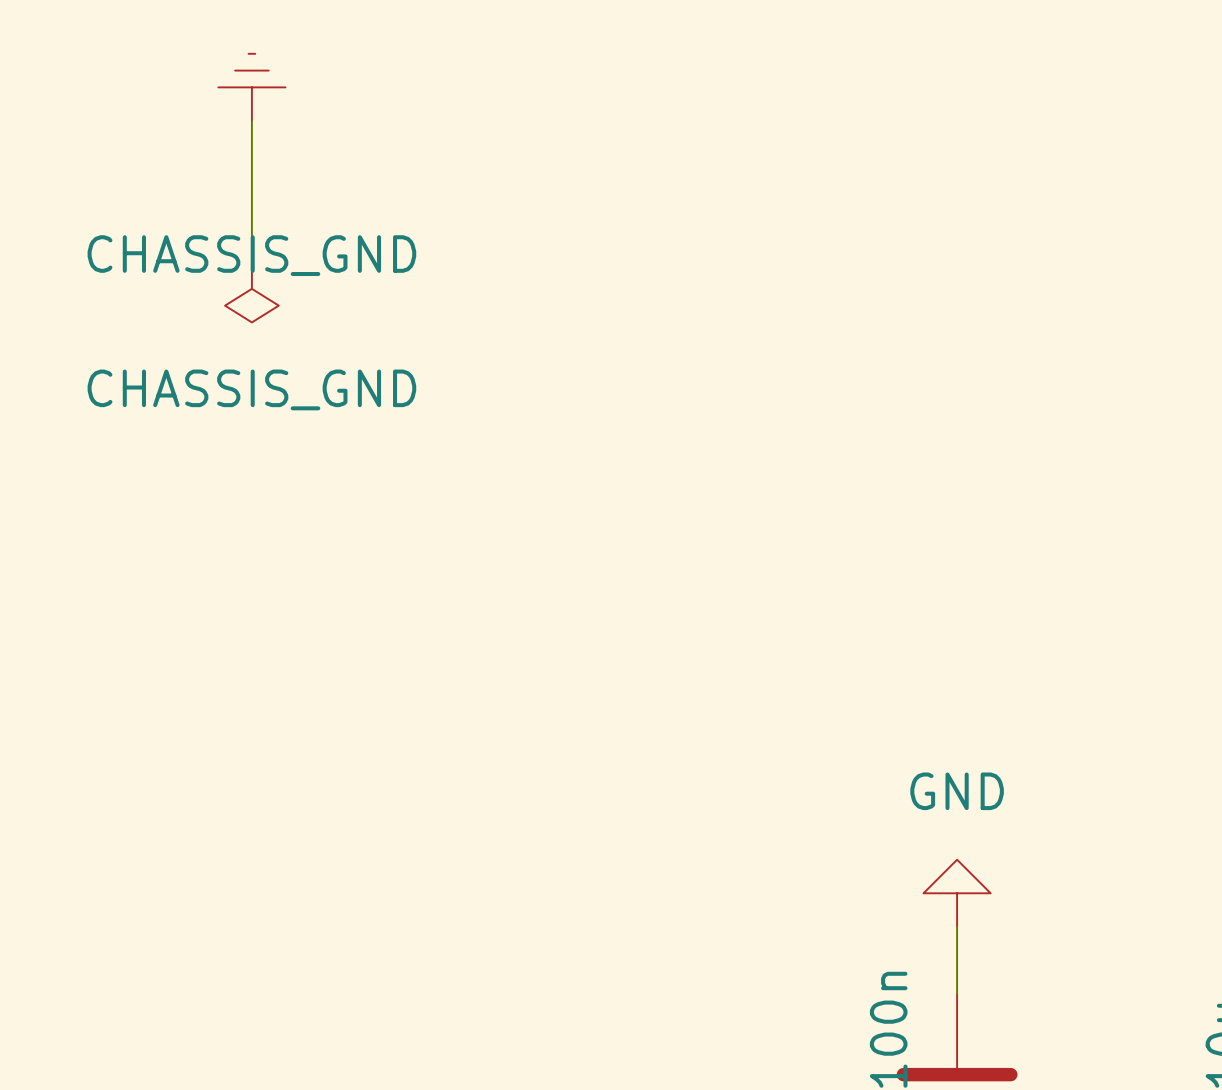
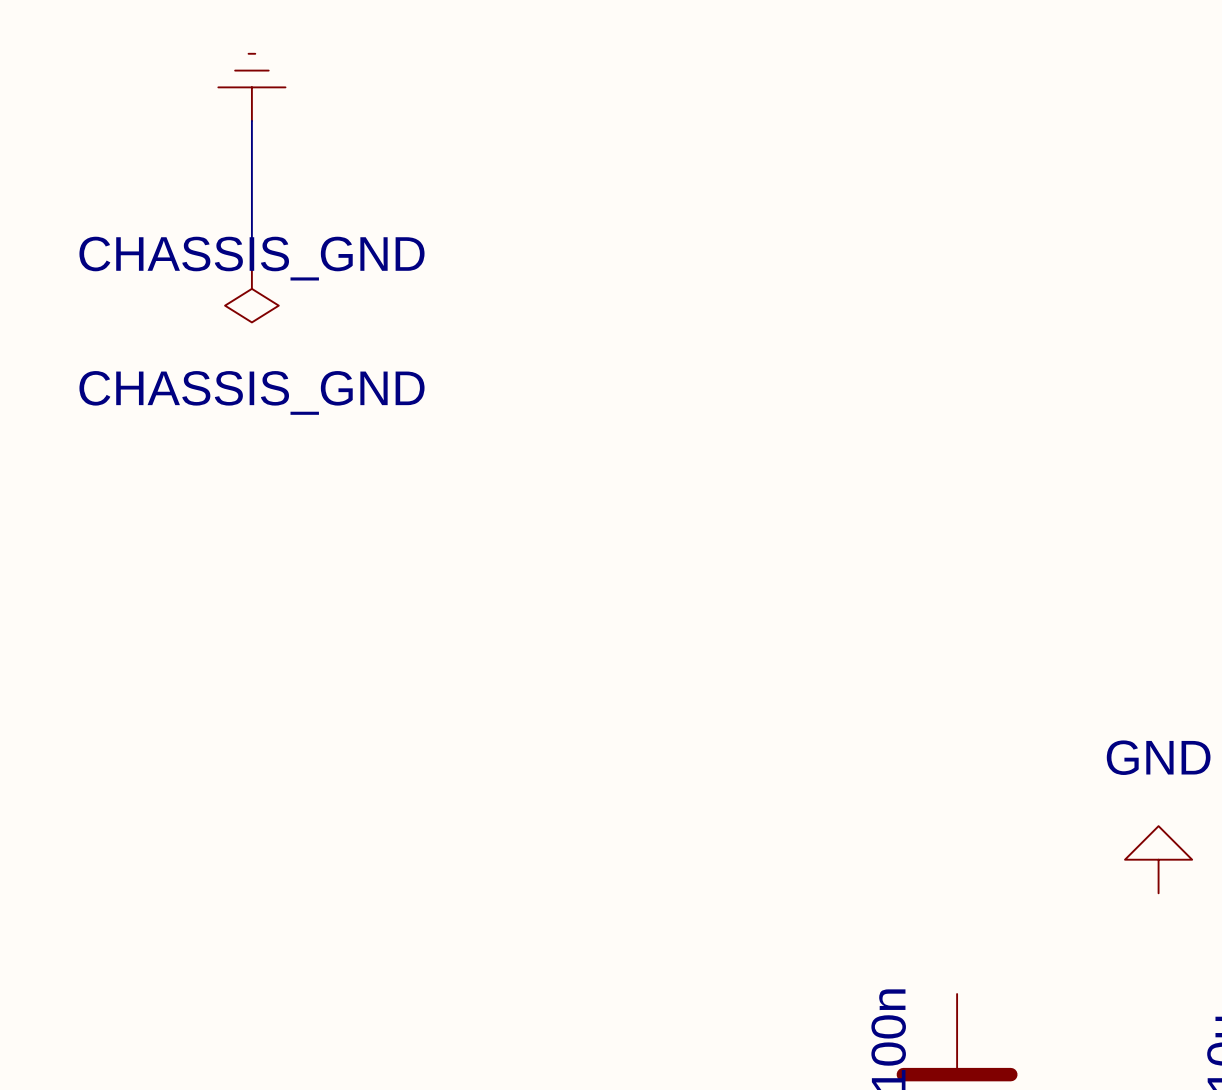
power symbol: none -> GND (1158, 859)
power symbol: GND (957, 893) -> none
wire: (957, 926) (957, 994) -> none

